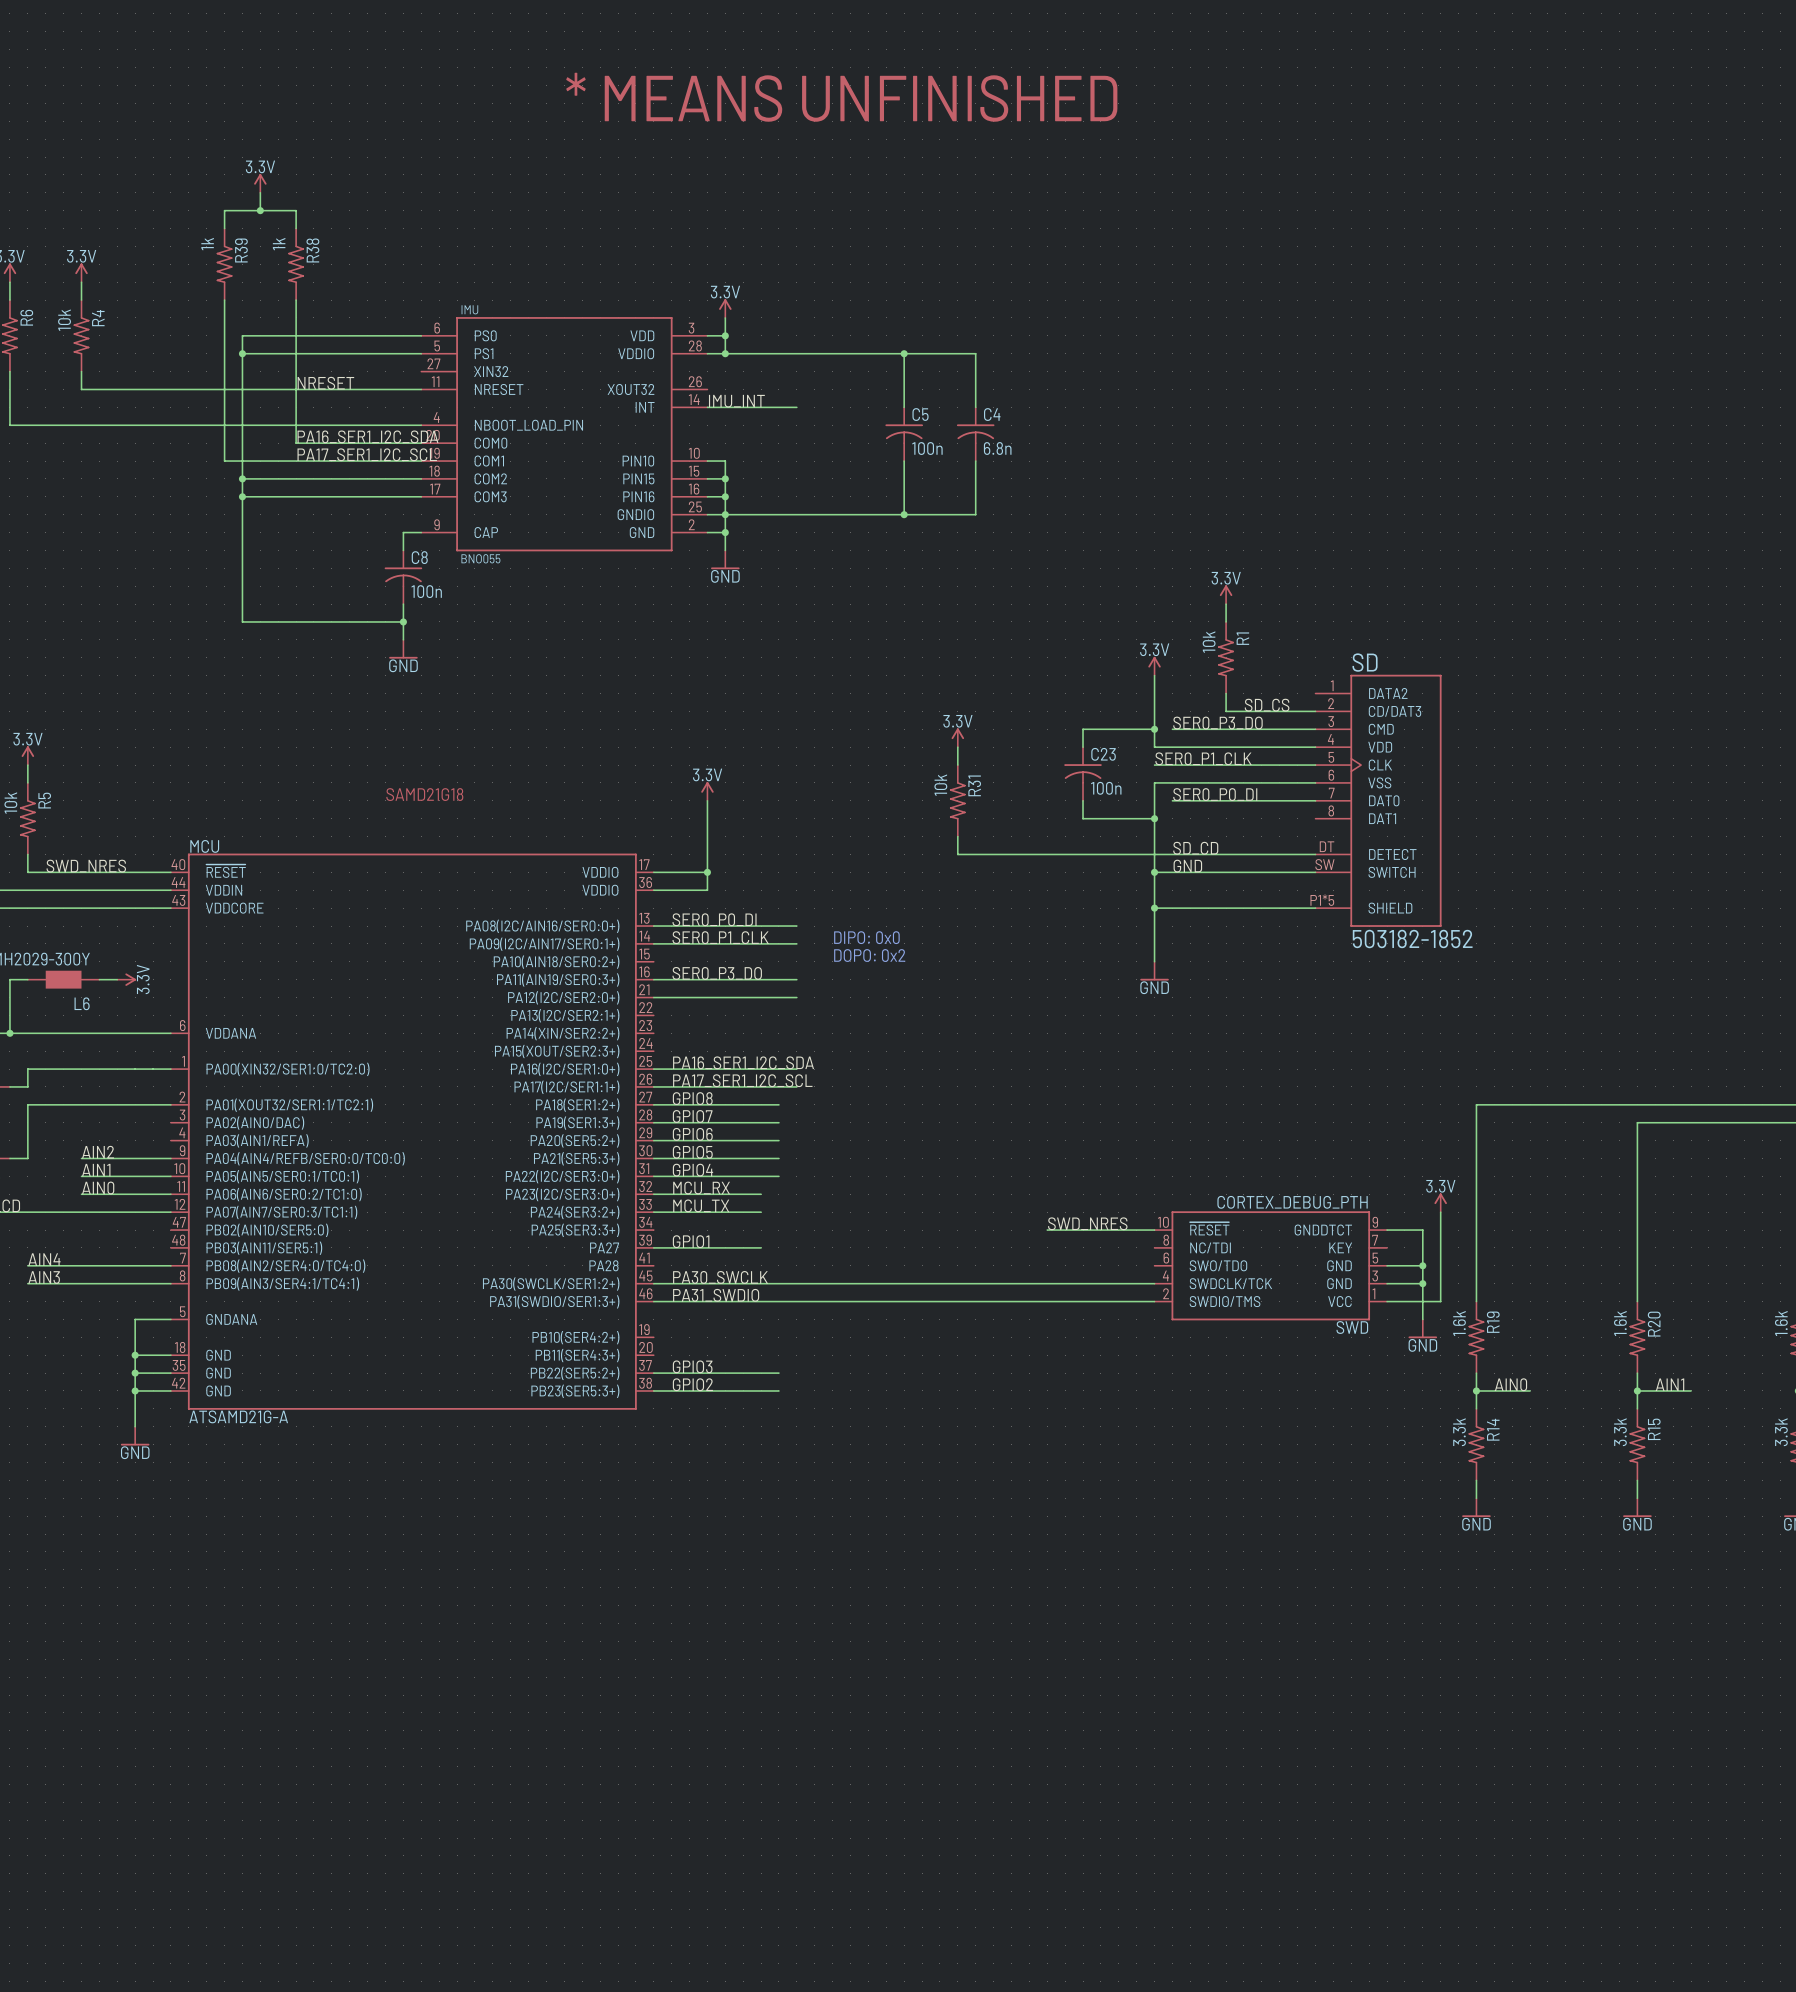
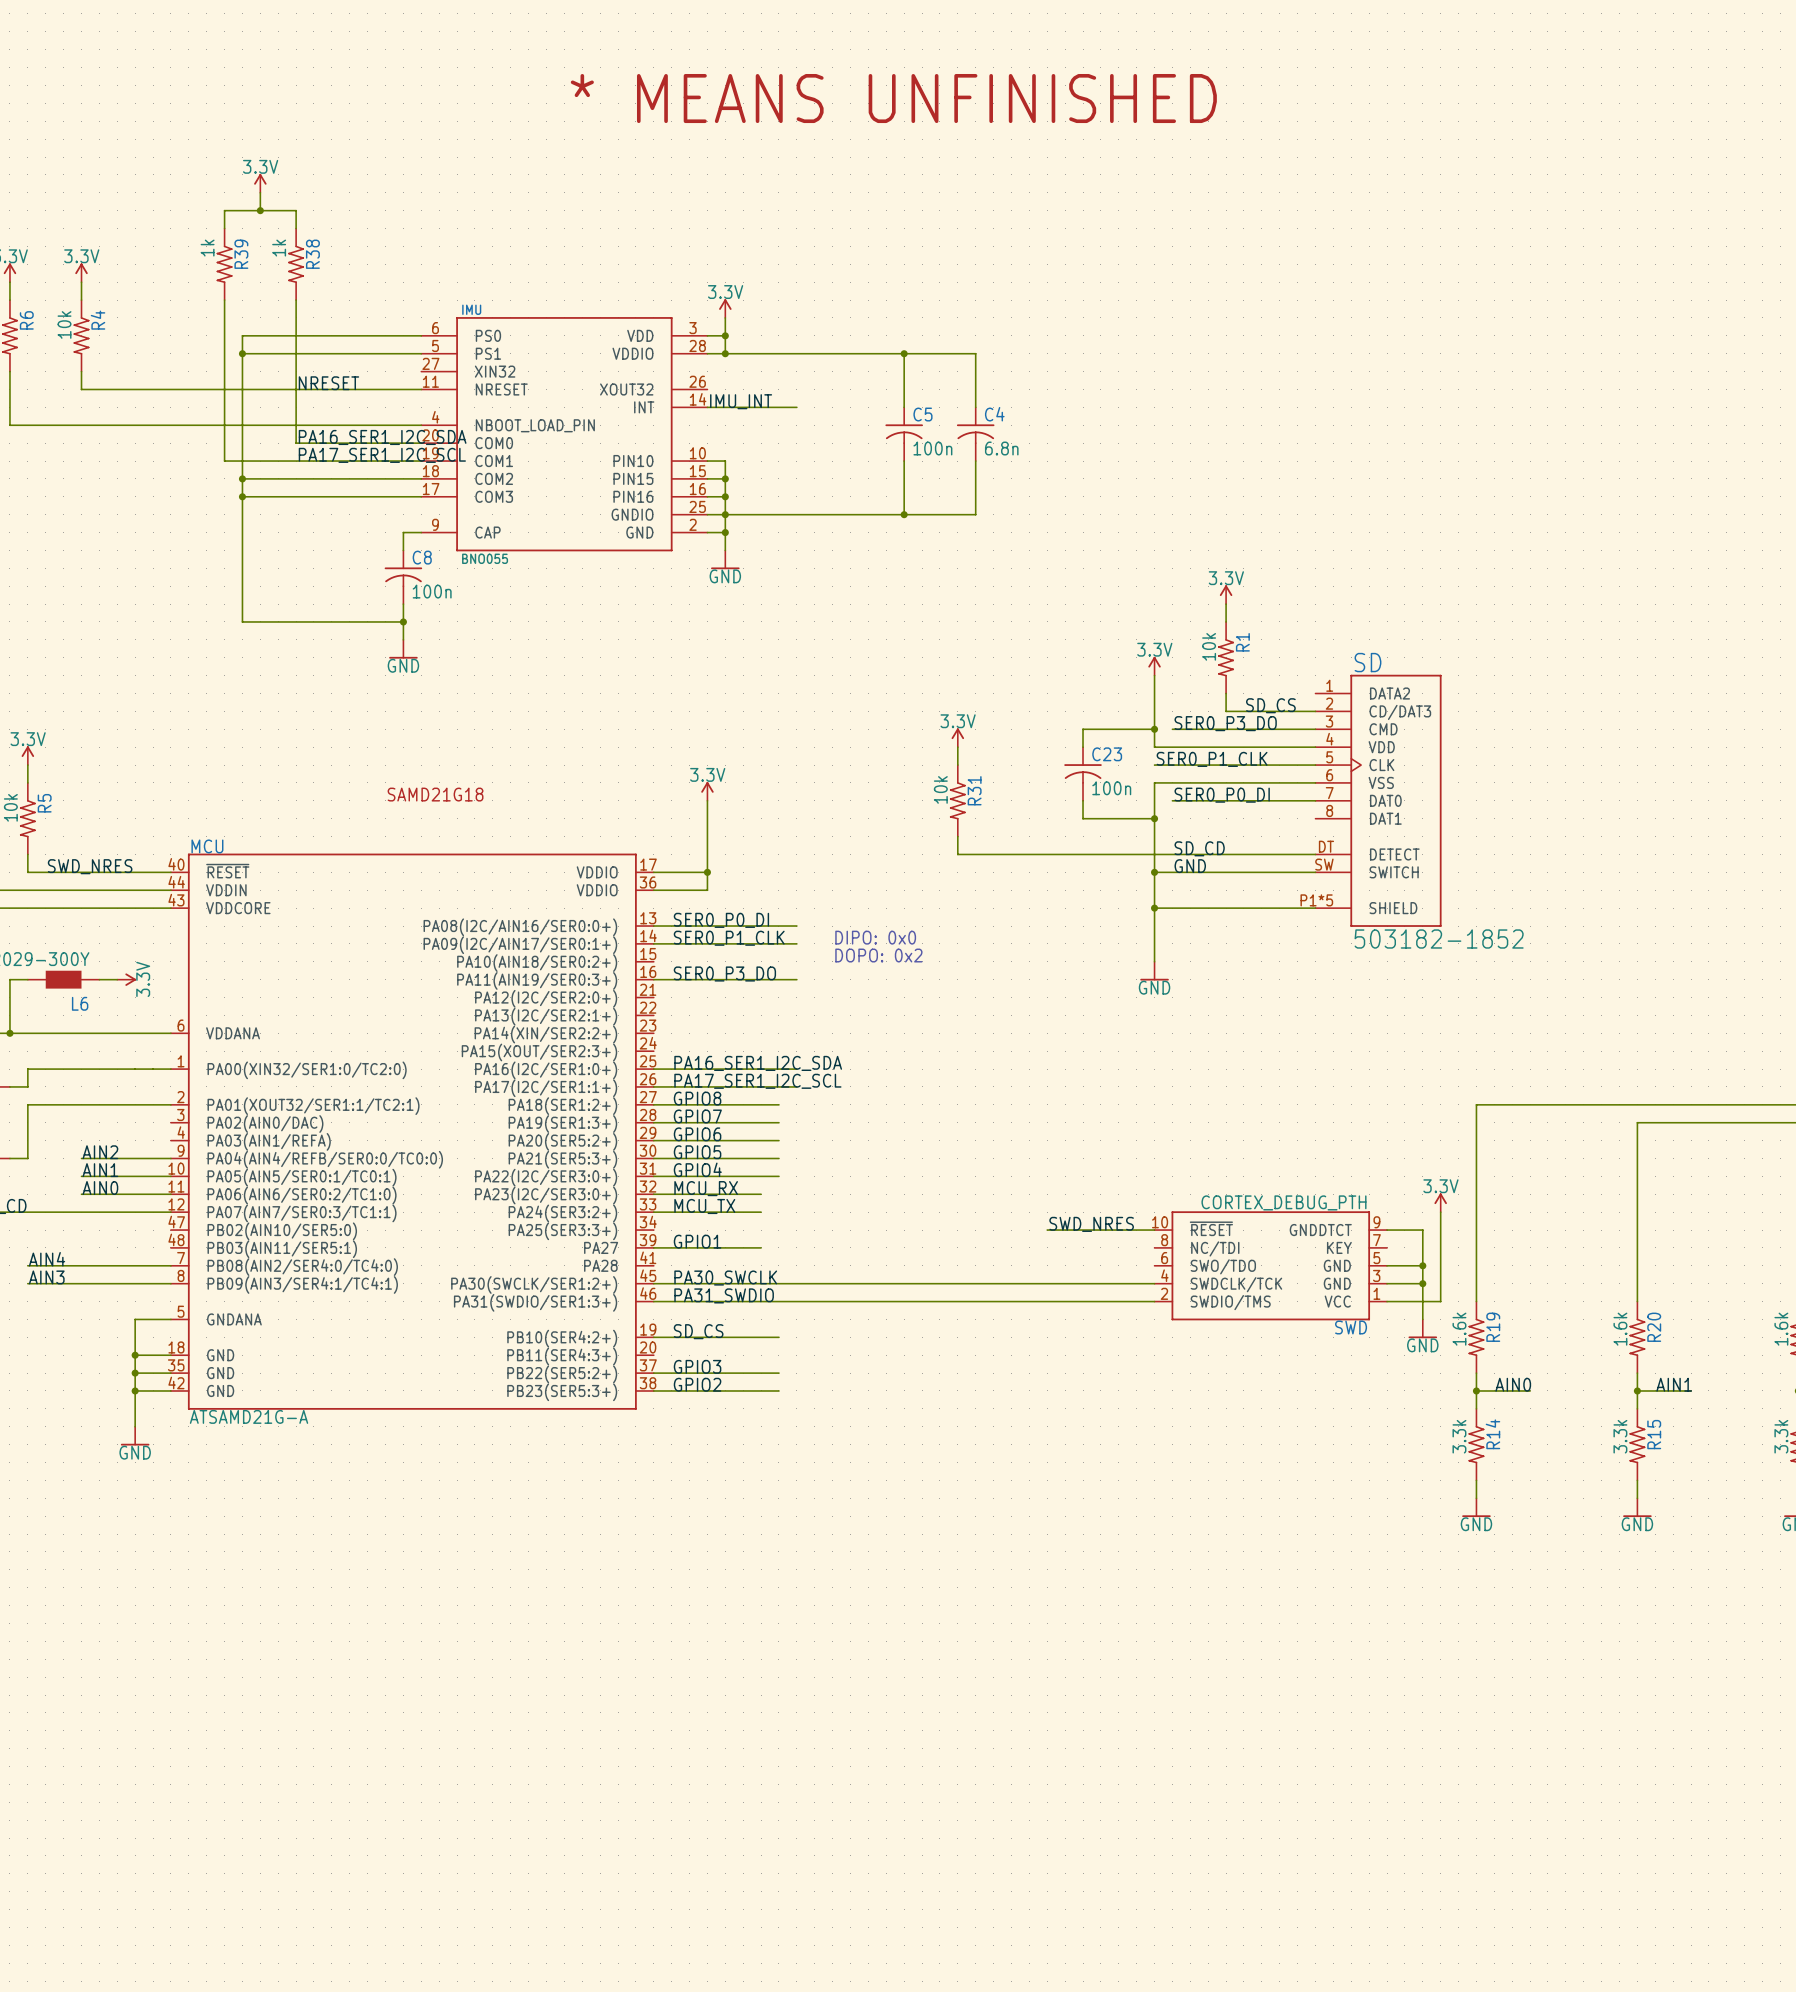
wire: (653, 997) (796, 997) -> none
label: none -> SD_CS (698, 1331)
wire: none -> (653, 1337) (778, 1337)

